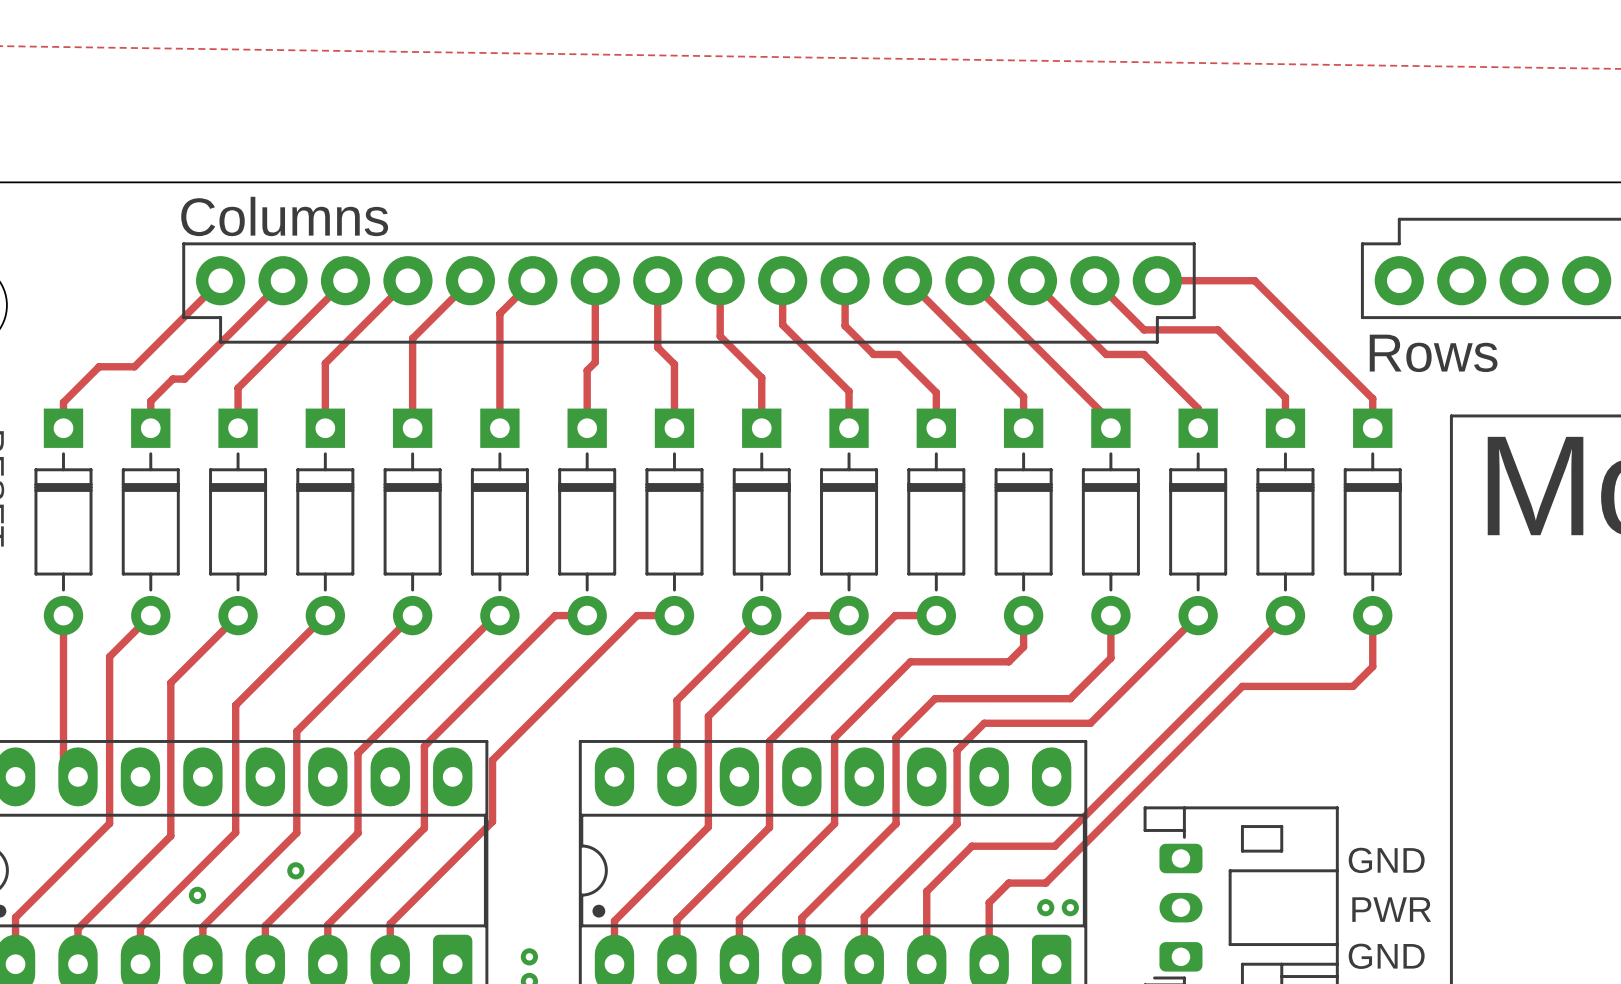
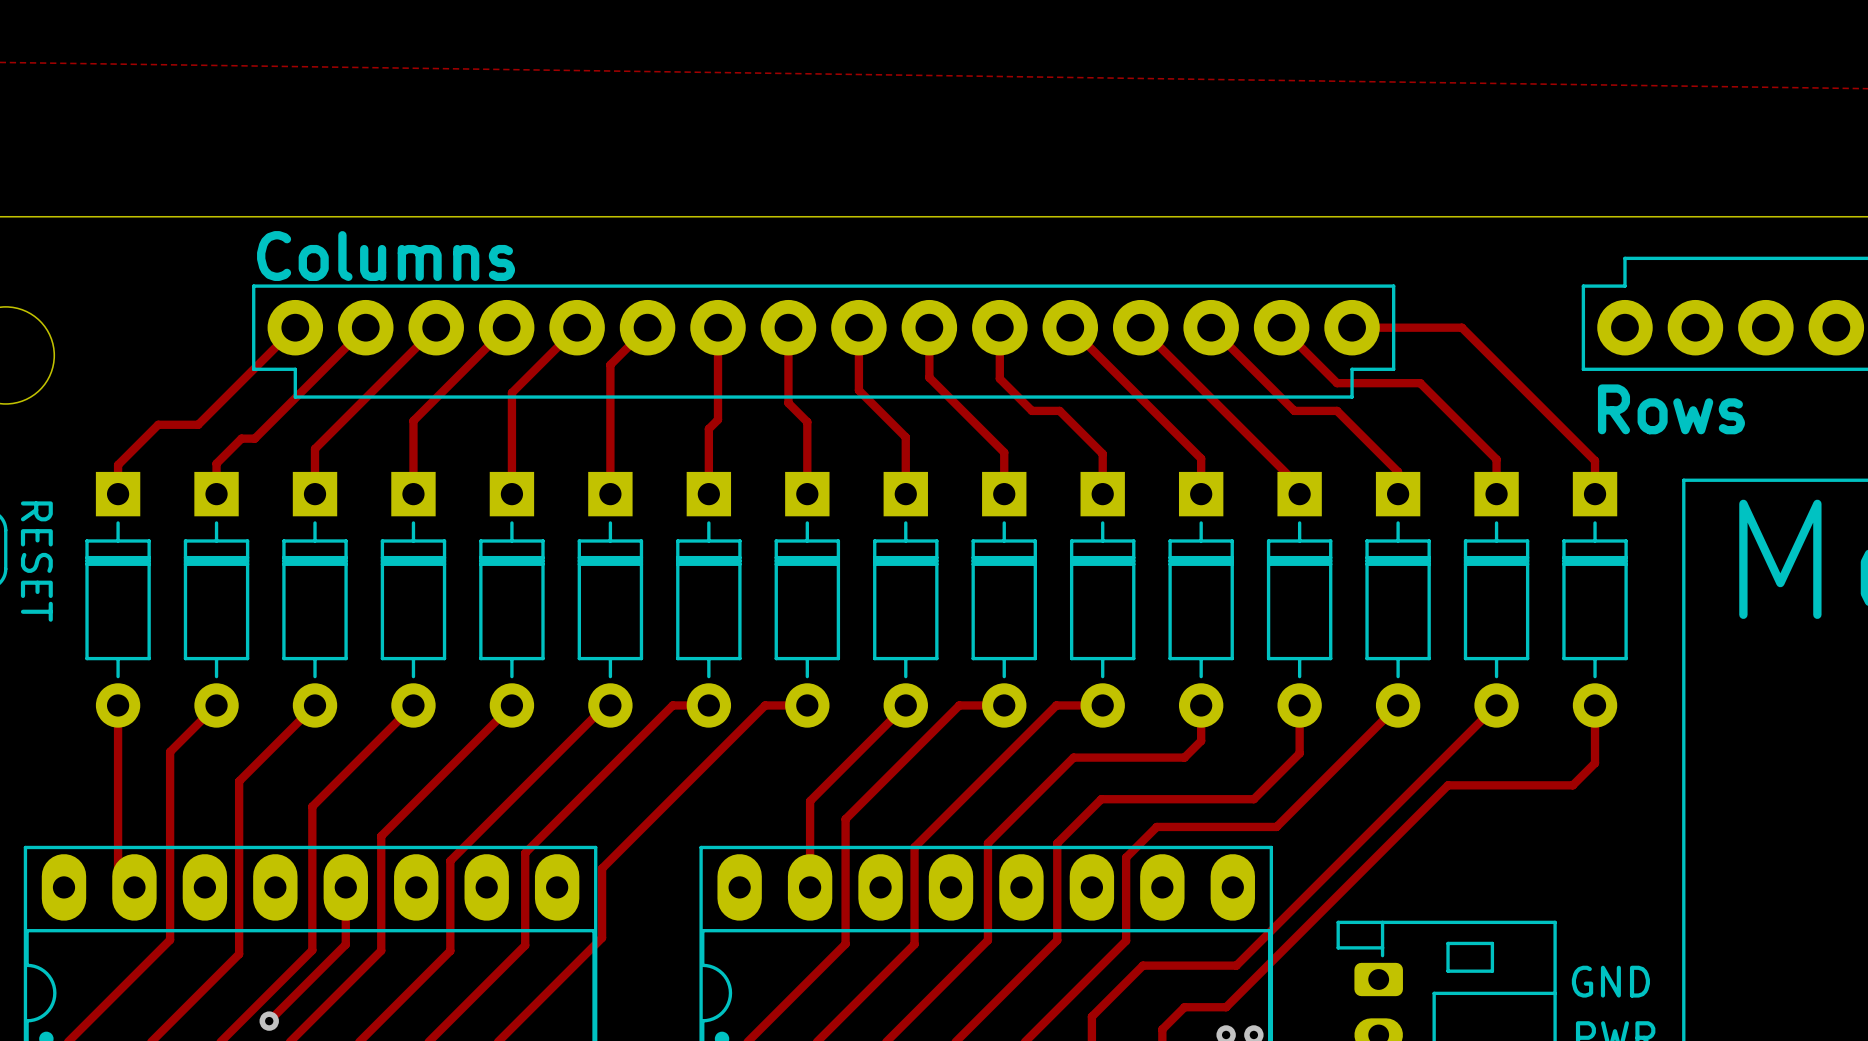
track: none -> (345, 887) (345, 944) (269, 1021)
via: (295, 870) -> none

